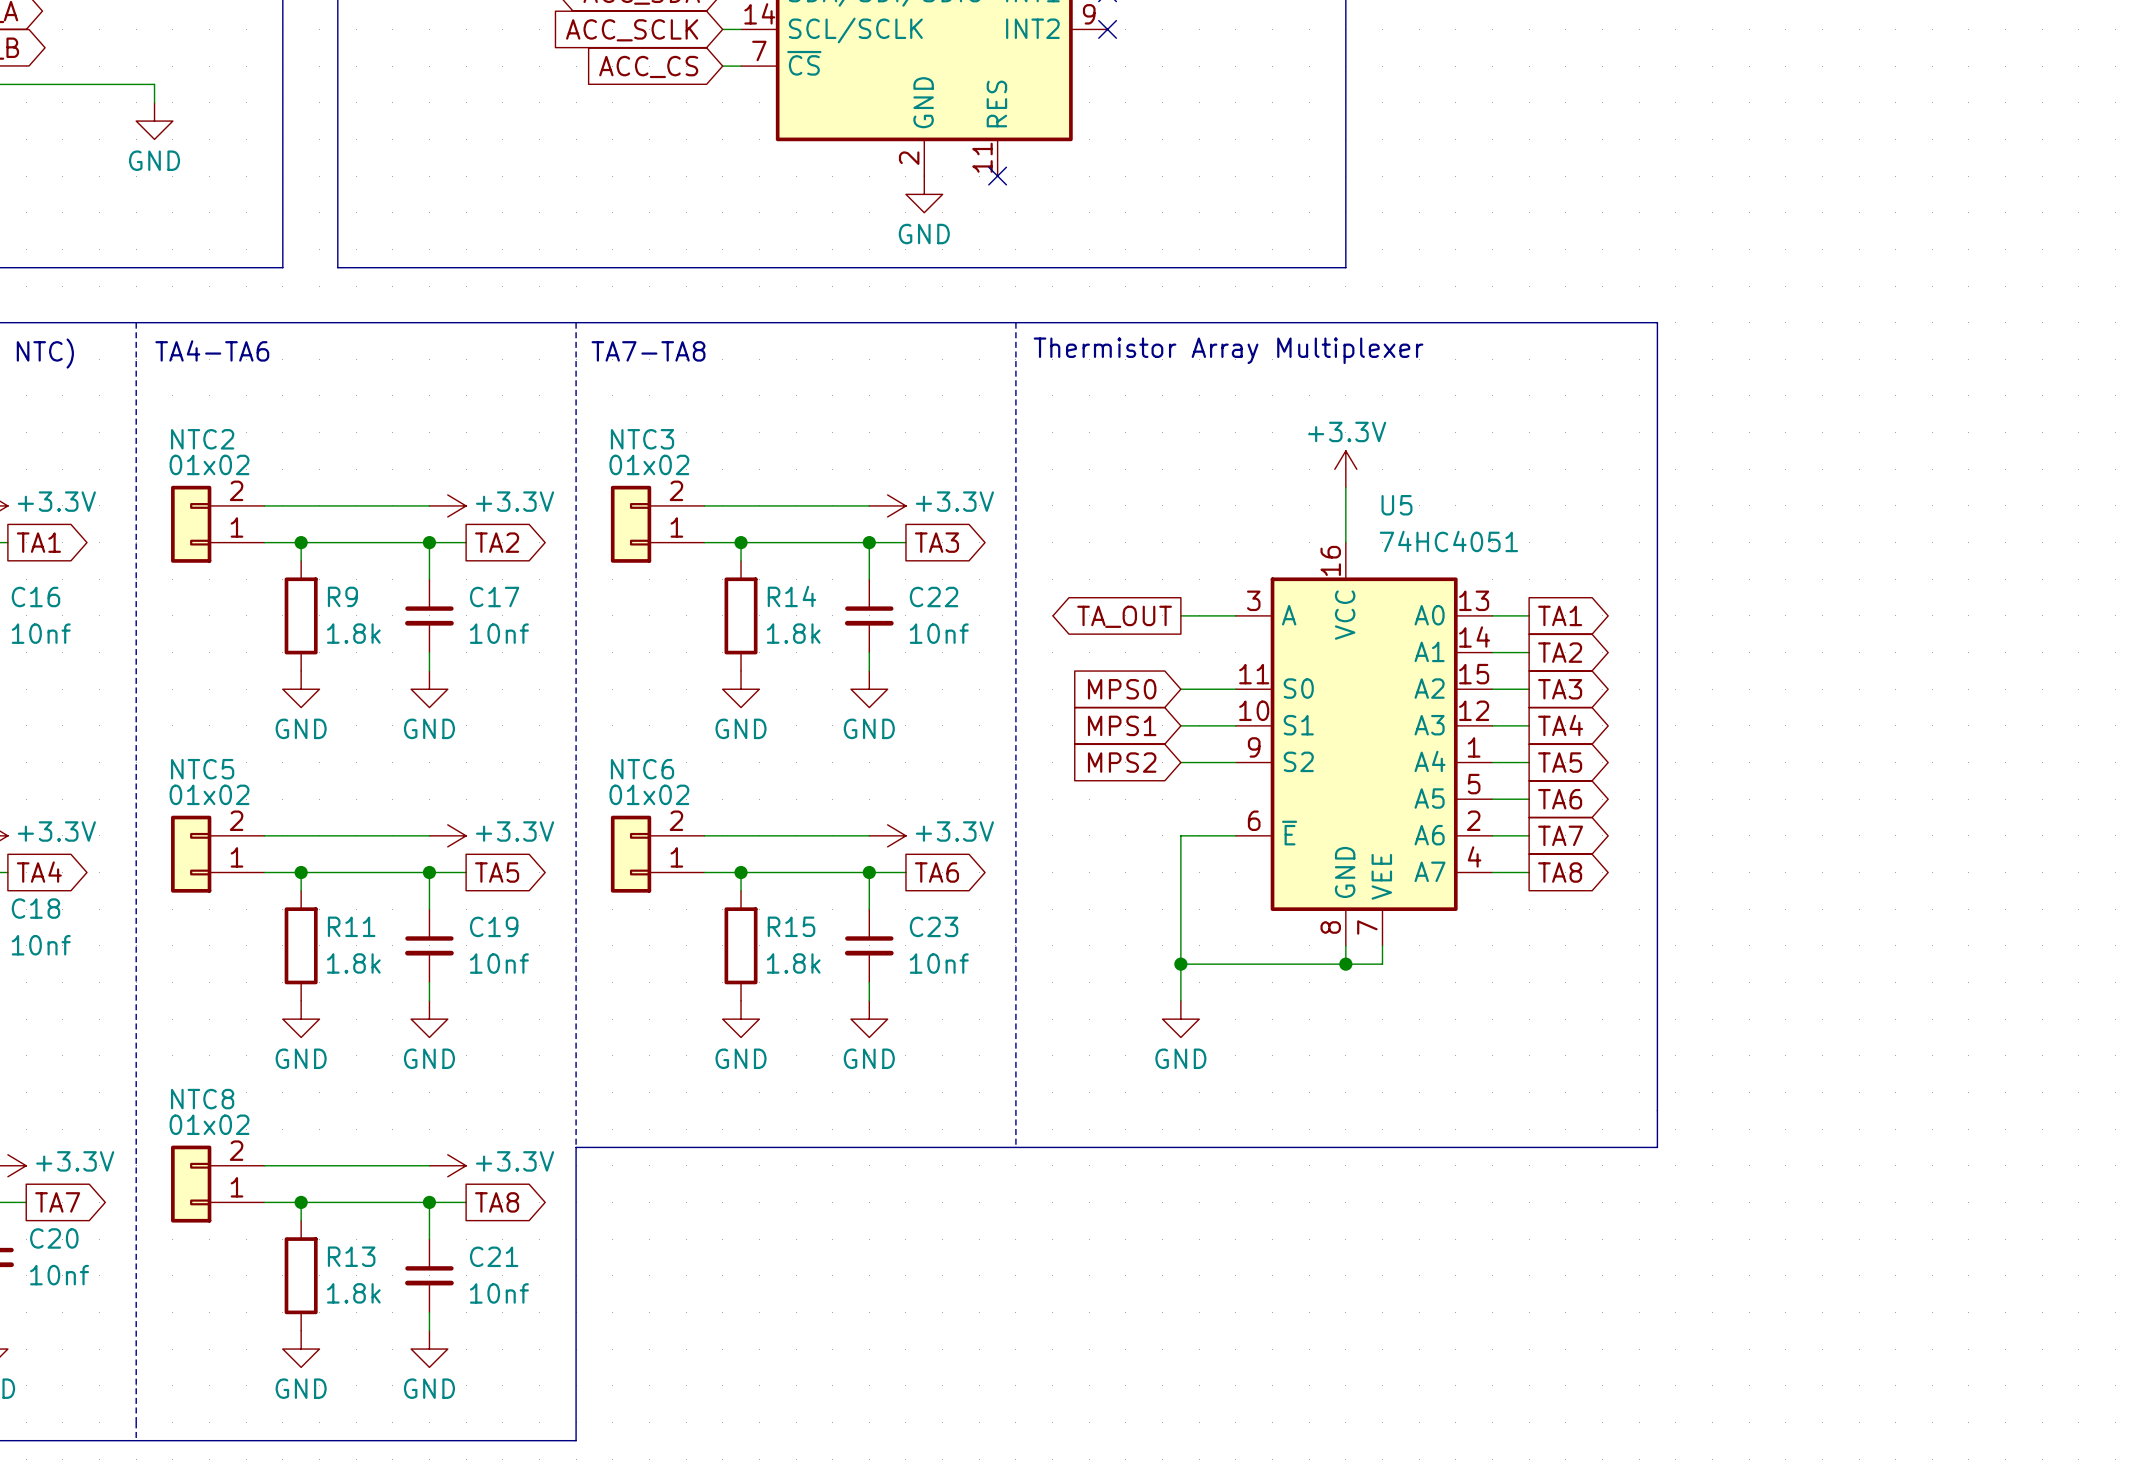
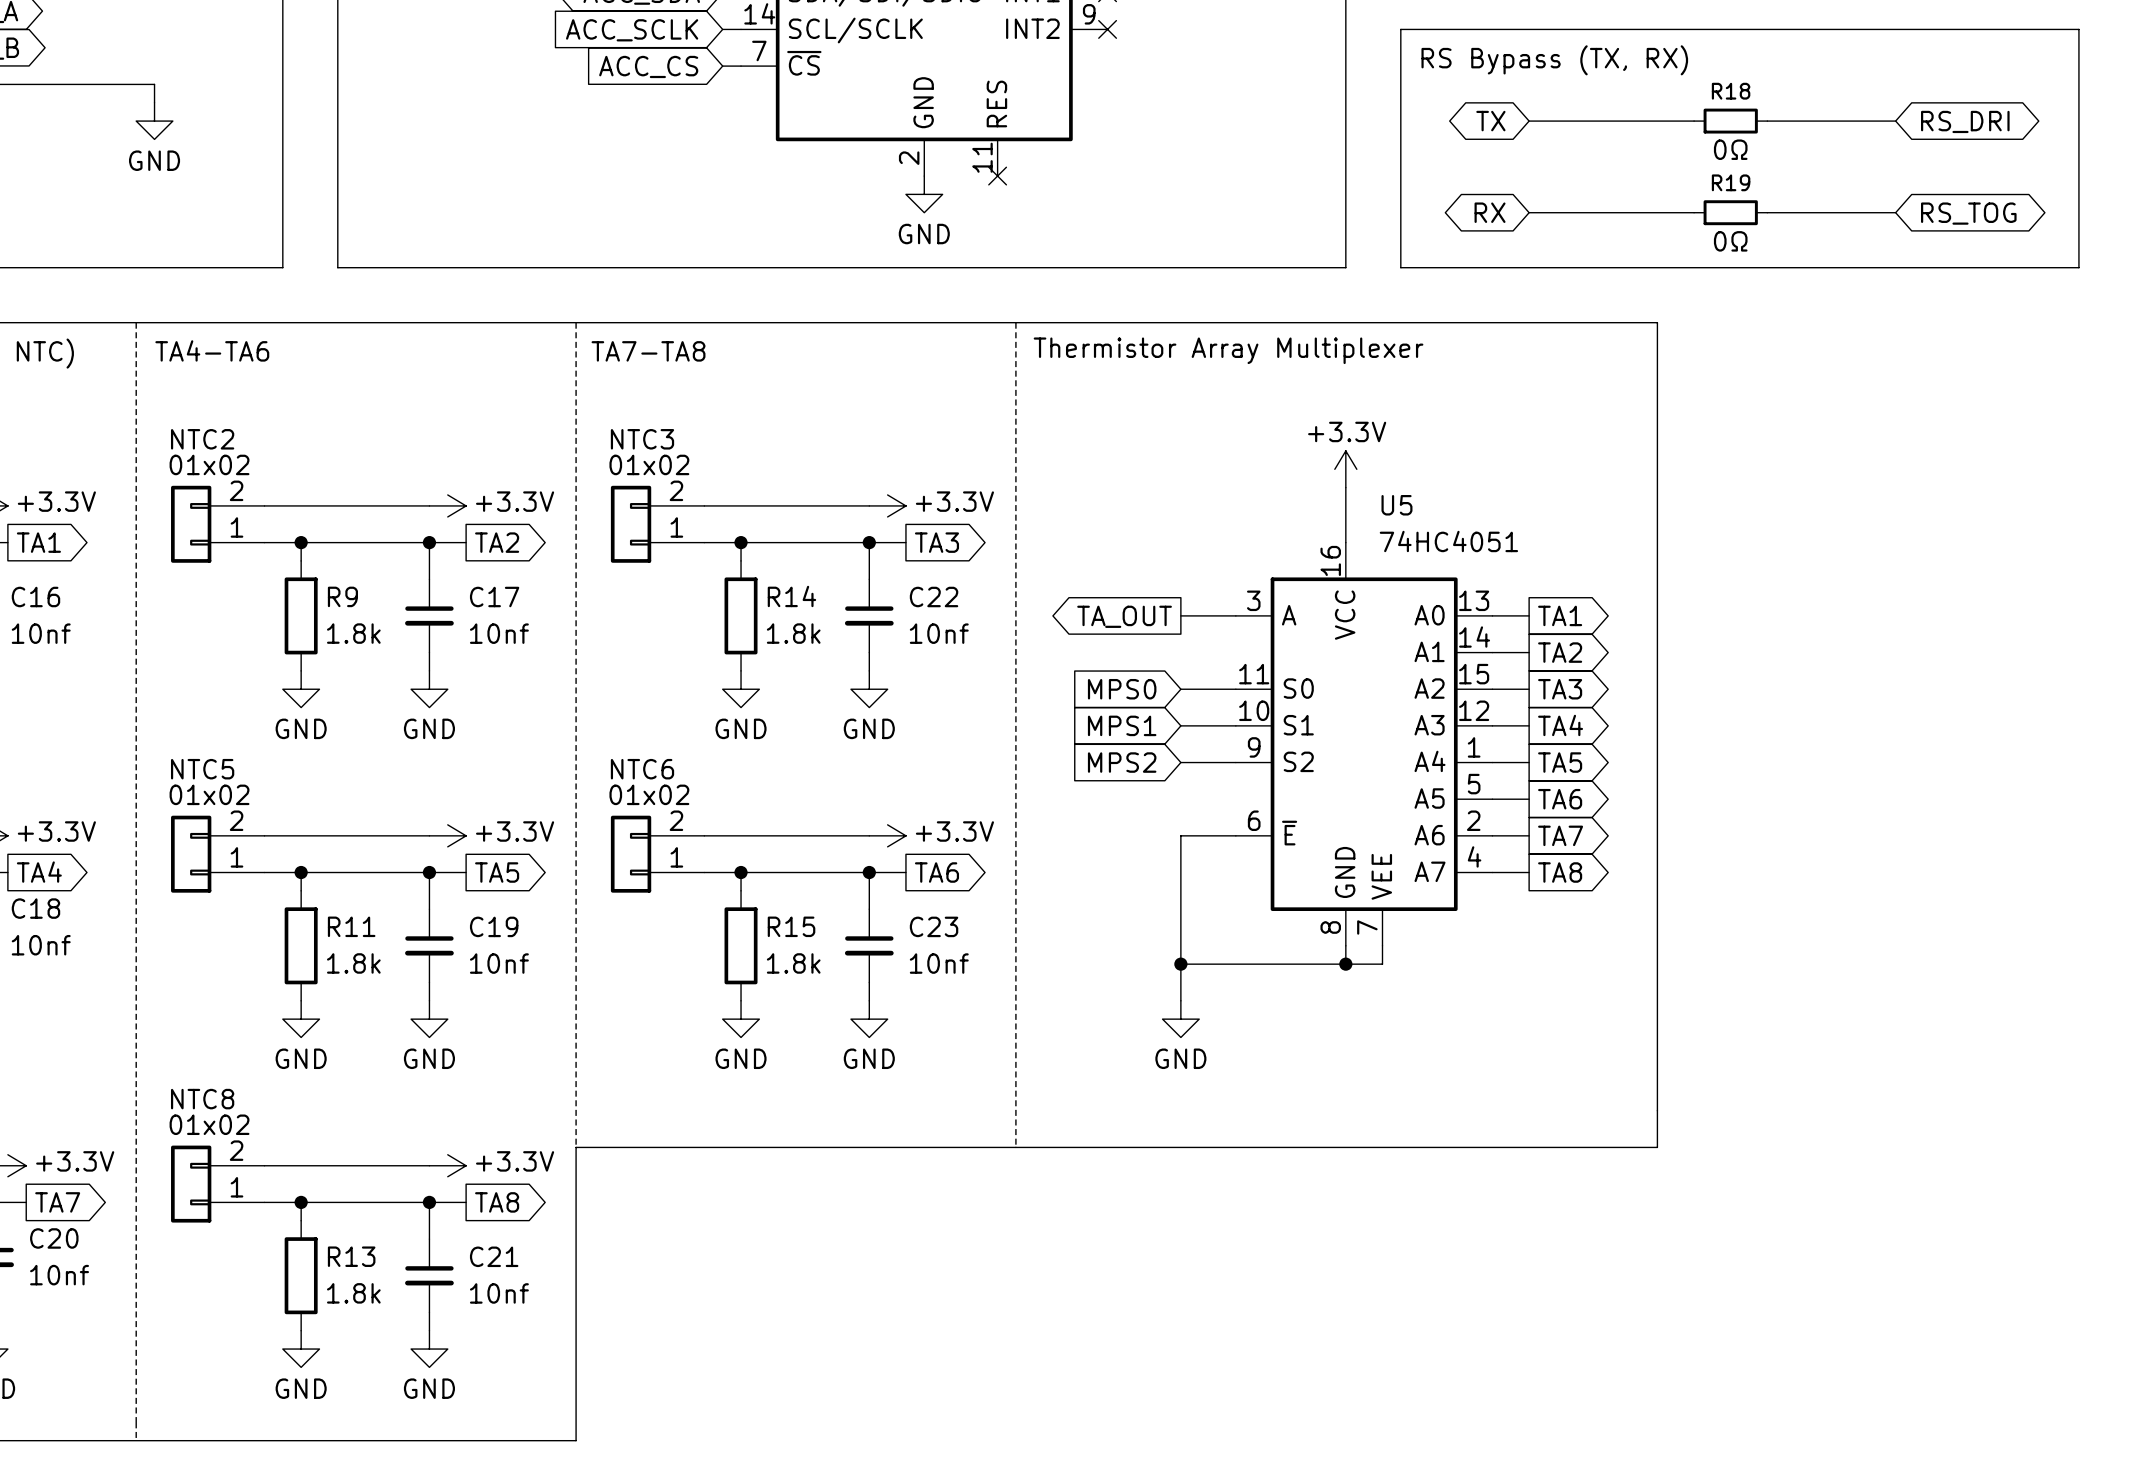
line: none -> (1400, 29) (2078, 29) (2078, 267) (1400, 267) (1400, 29)
text: none -> RS Bypass (TX, RX) (1554, 60)
global label: none -> TX (1490, 121)
wire: none -> (1529, 121) (1694, 121)
R18: none -> 0Ω (1730, 121)
wire: none -> (1767, 121) (1895, 121)
global label: none -> RS_DRI (1965, 121)
global label: none -> RX (1490, 212)
wire: none -> (1529, 212) (1694, 212)
R19: none -> 0Ω (1730, 212)
wire: none -> (1767, 212) (1895, 212)
global label: none -> RS_TOG (1968, 213)

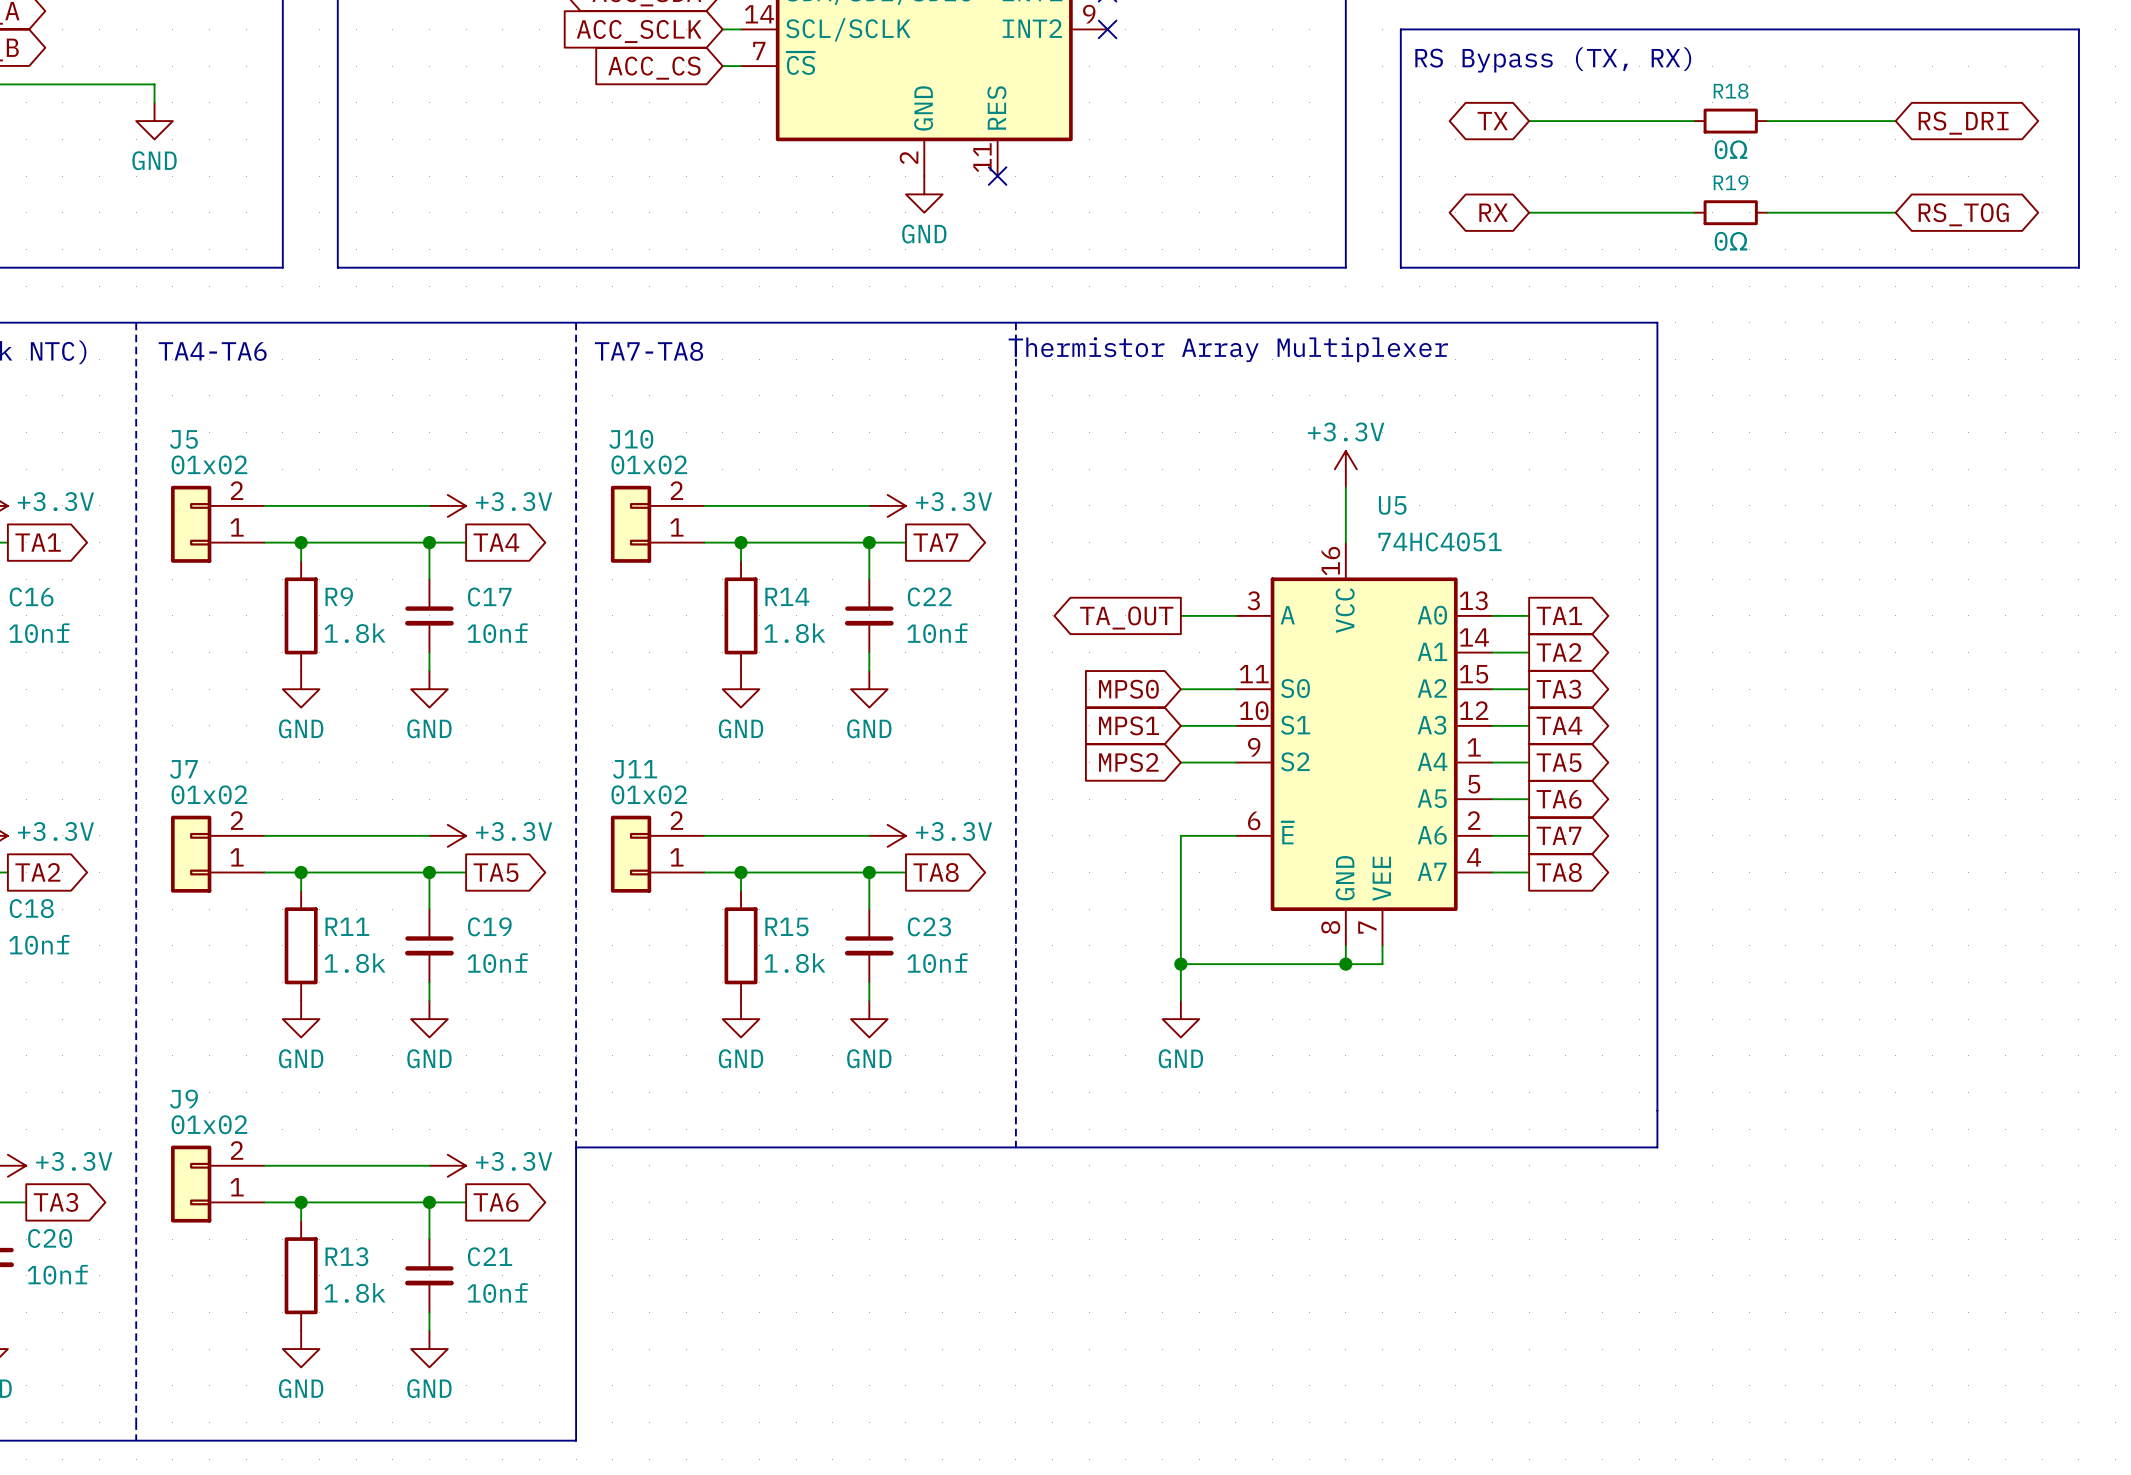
NTC2 name: NTC2 (202, 439) -> J5 (183, 439)
NTC3 name: NTC3 (642, 439) -> J10 (631, 439)
global label: TA2 (497, 542) -> TA4 (496, 542)
global label: TA3 (936, 542) -> TA7 (935, 542)
NTC5 name: NTC5 (202, 769) -> J7 (183, 769)
NTC6 name: NTC6 (642, 769) -> J11 (635, 769)
global label: TA4 (39, 872) -> TA2 (37, 872)
global label: TA6 (936, 872) -> TA8 (936, 872)
NTC8 name: NTC8 (202, 1099) -> J9 (183, 1099)
global label: TA7 (57, 1202) -> TA3 (55, 1202)
global label: TA8 (497, 1202) -> TA6 (496, 1202)

